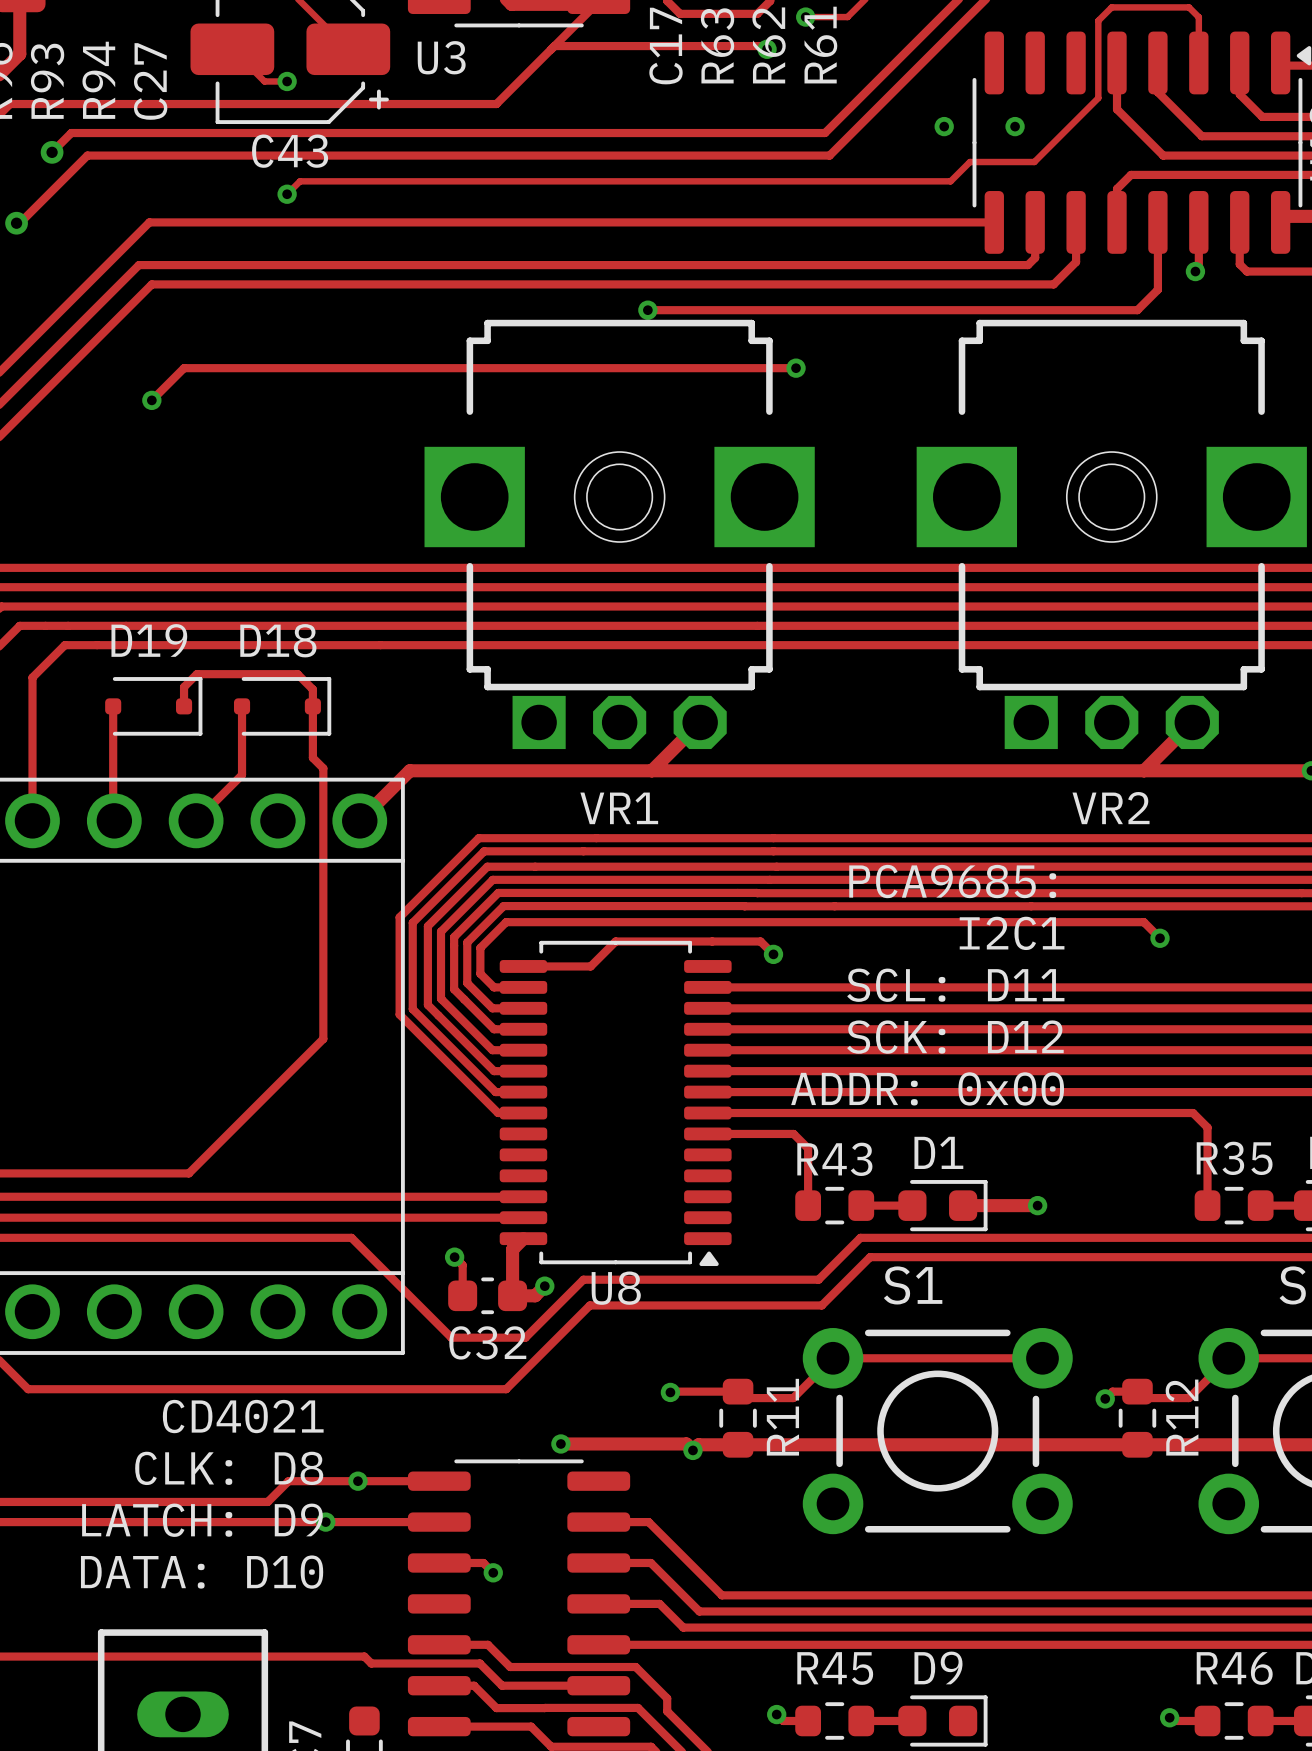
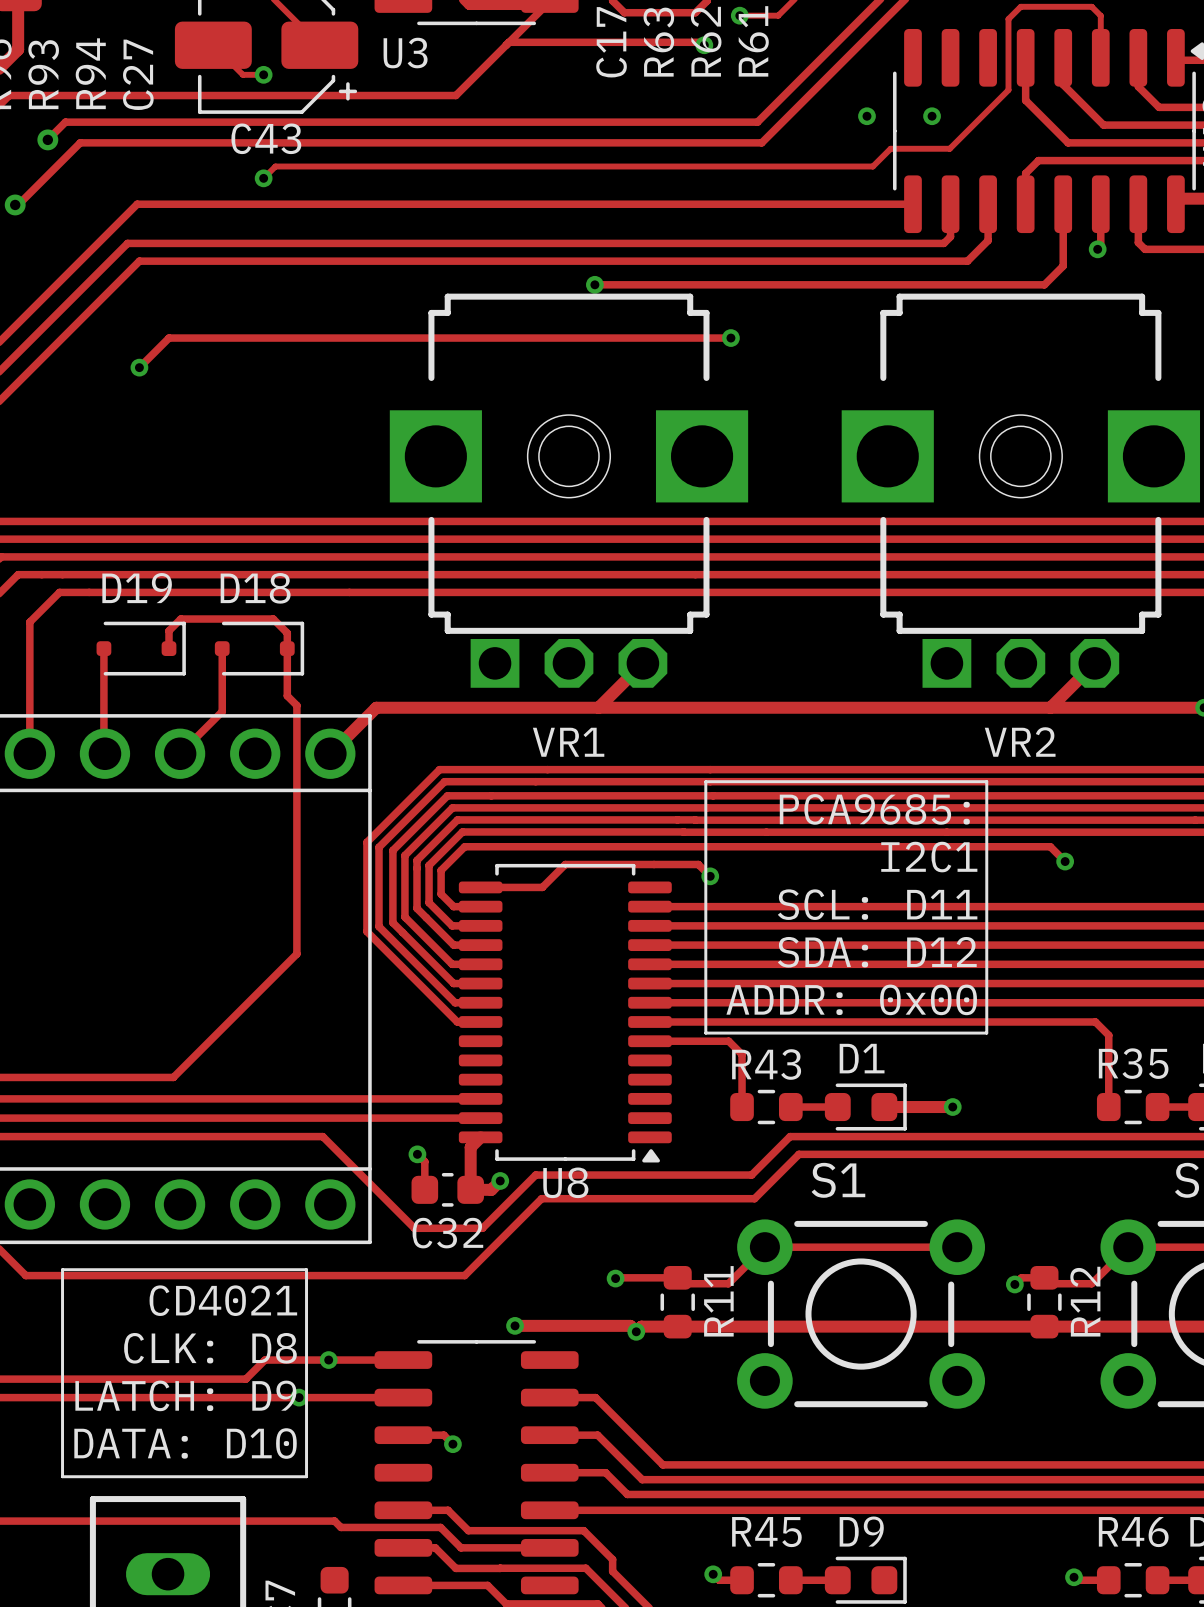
line: none -> (705, 781) (986, 781) (986, 1033) (705, 1033) (705, 781)
text: SCK: D12 (955, 1037) -> SDA: D12 (877, 952)
line: none -> (62, 1269) (306, 1269) (306, 1476) (62, 1476) (62, 1269)

